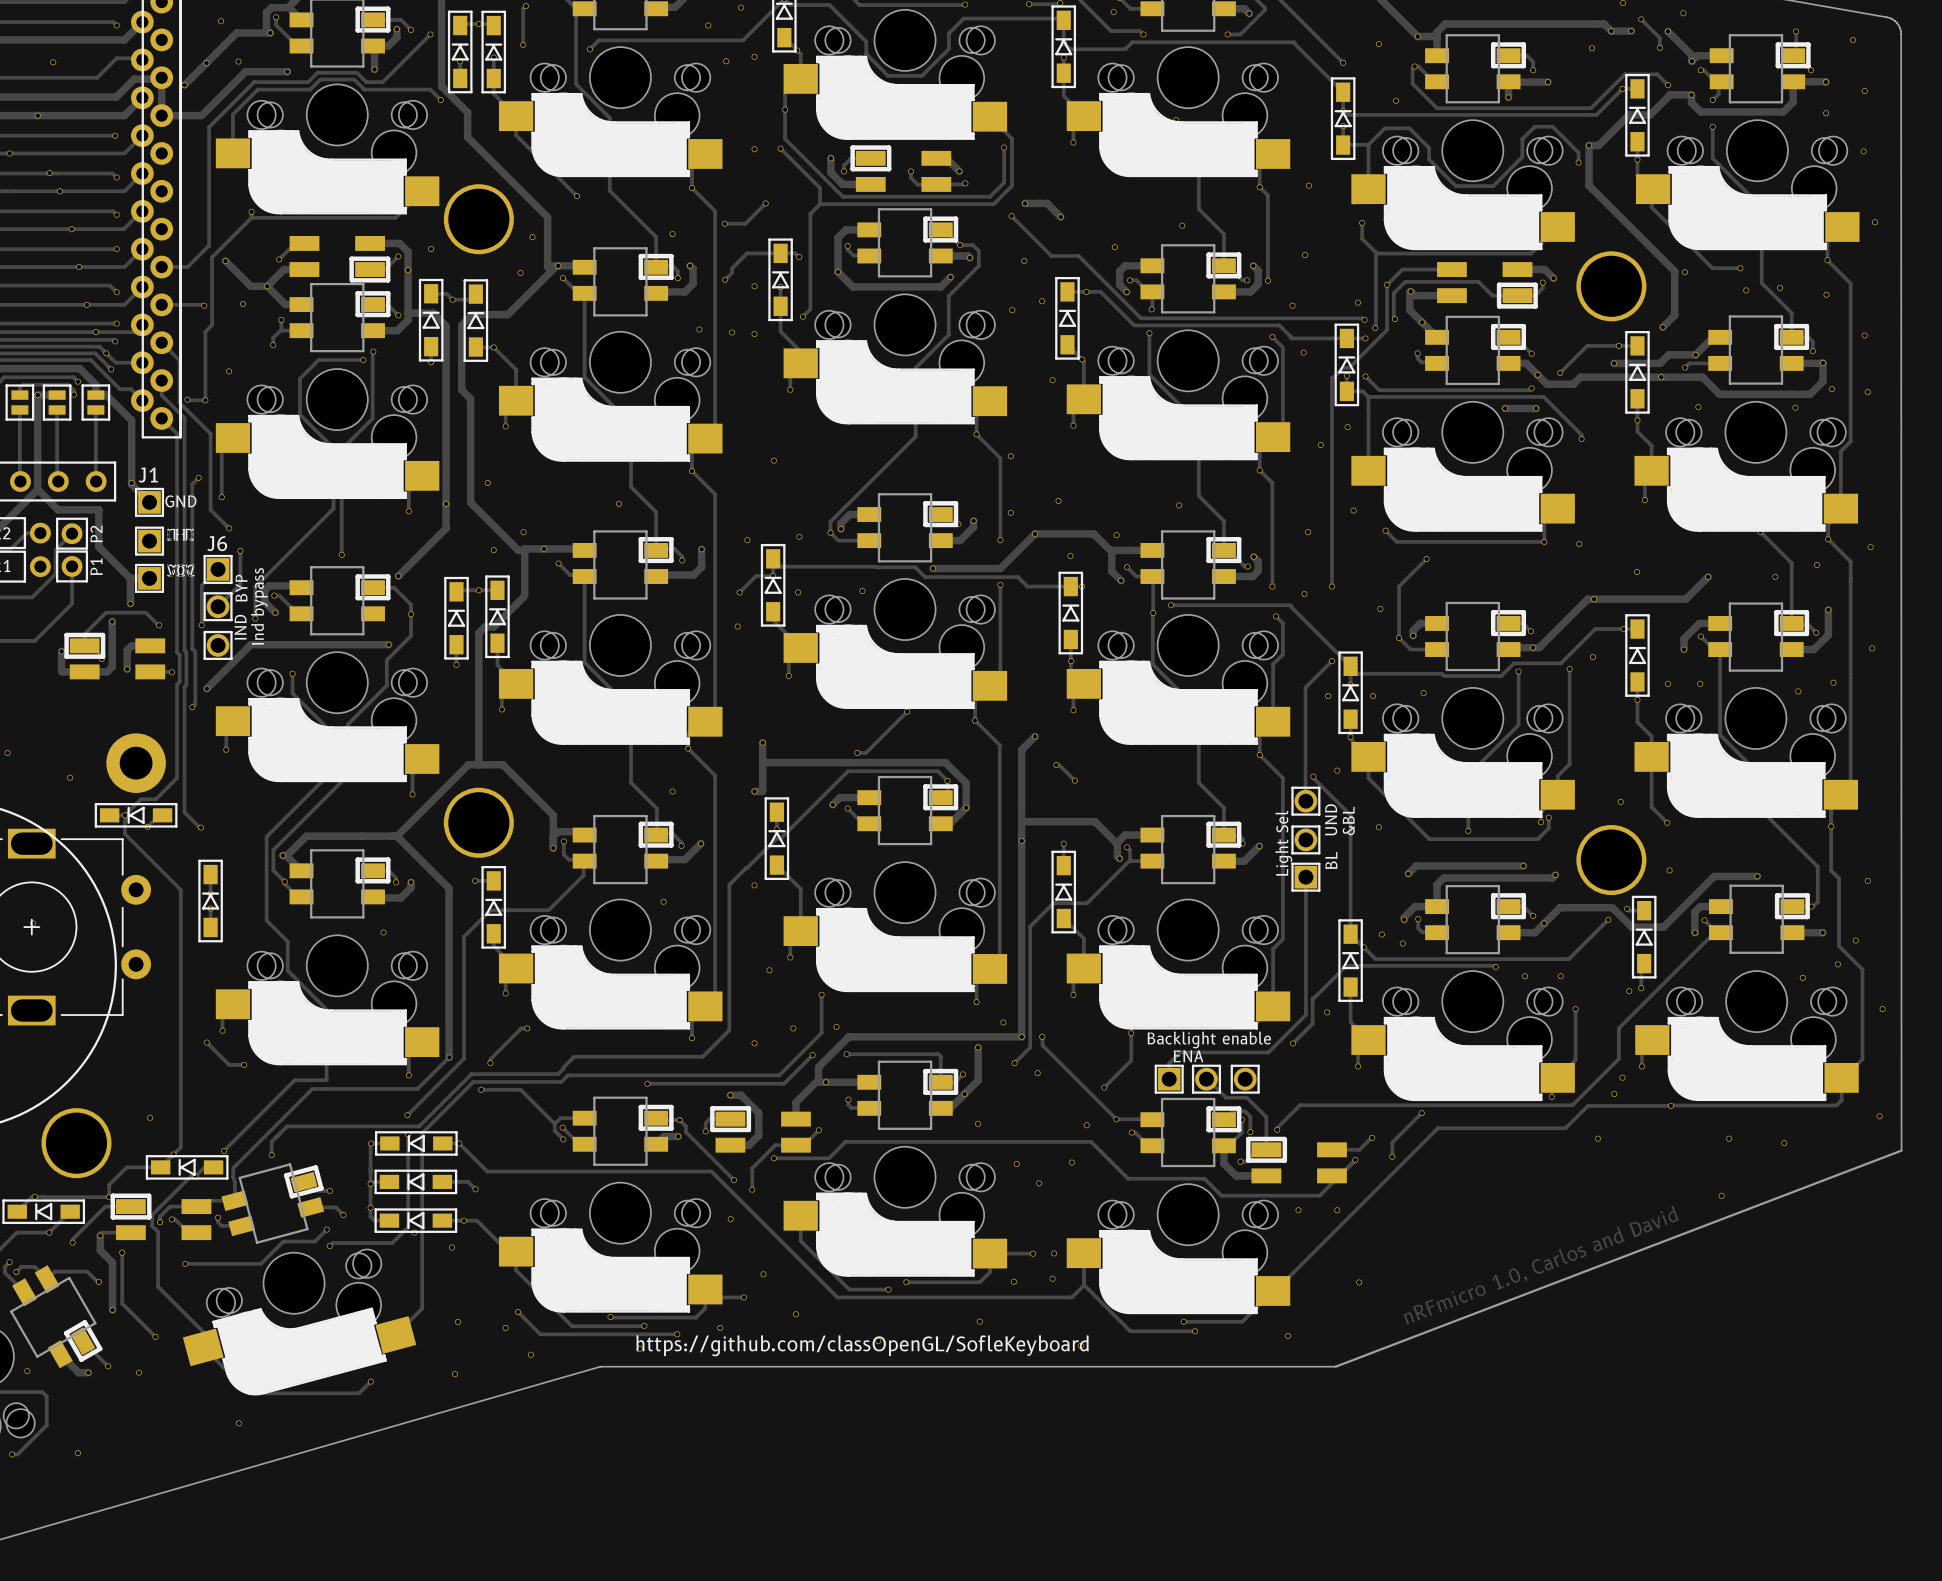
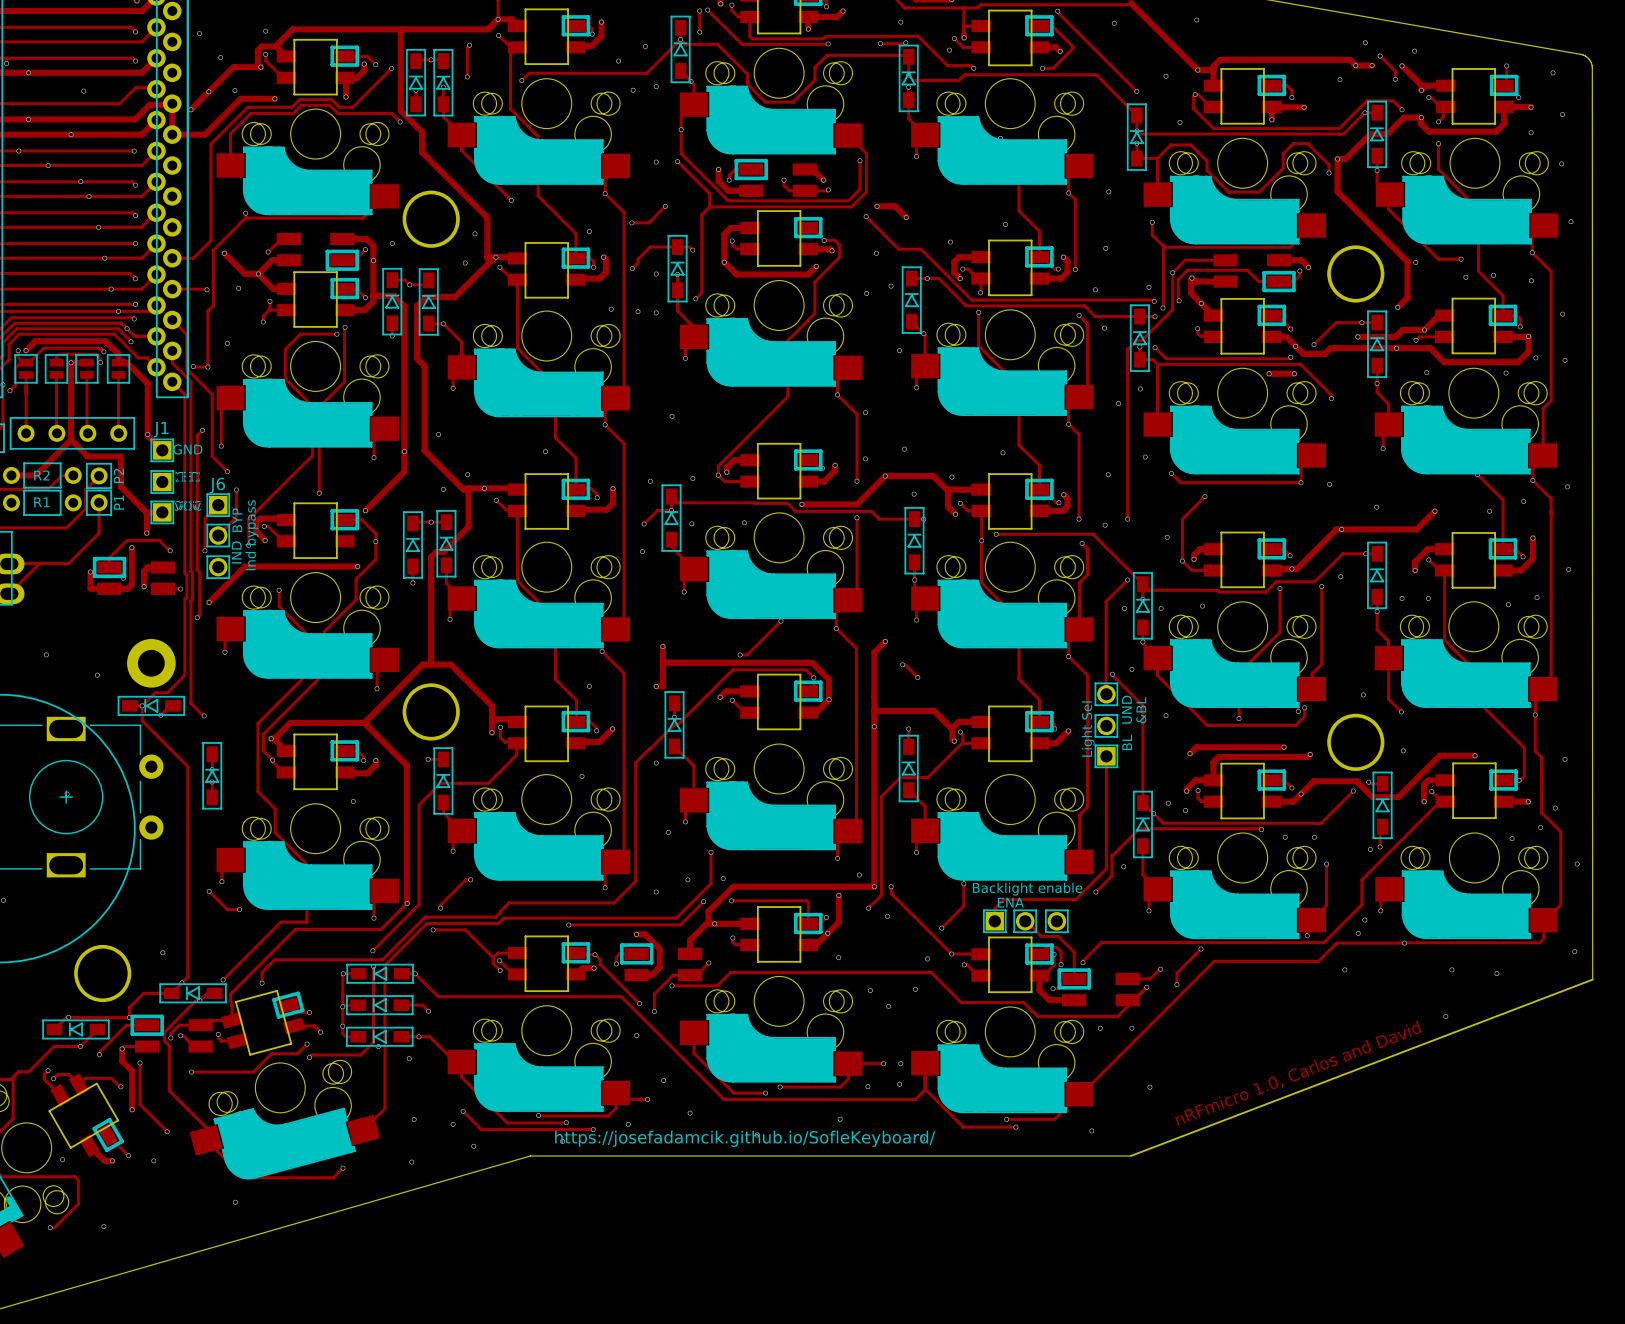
text: https://github.com/classOpenGL/SofleKeyboard (862, 1345) -> https://josefadamcik.github.io/SofleKeyboard/ (745, 1138)

